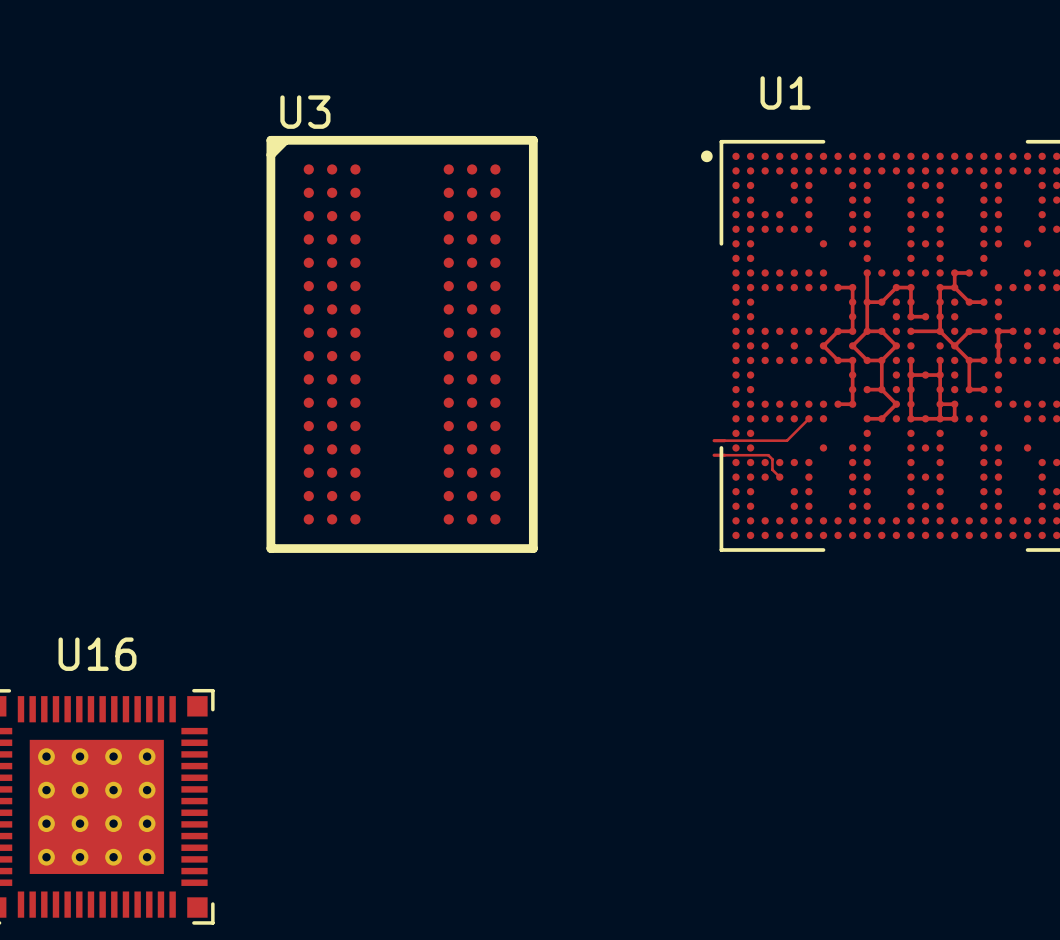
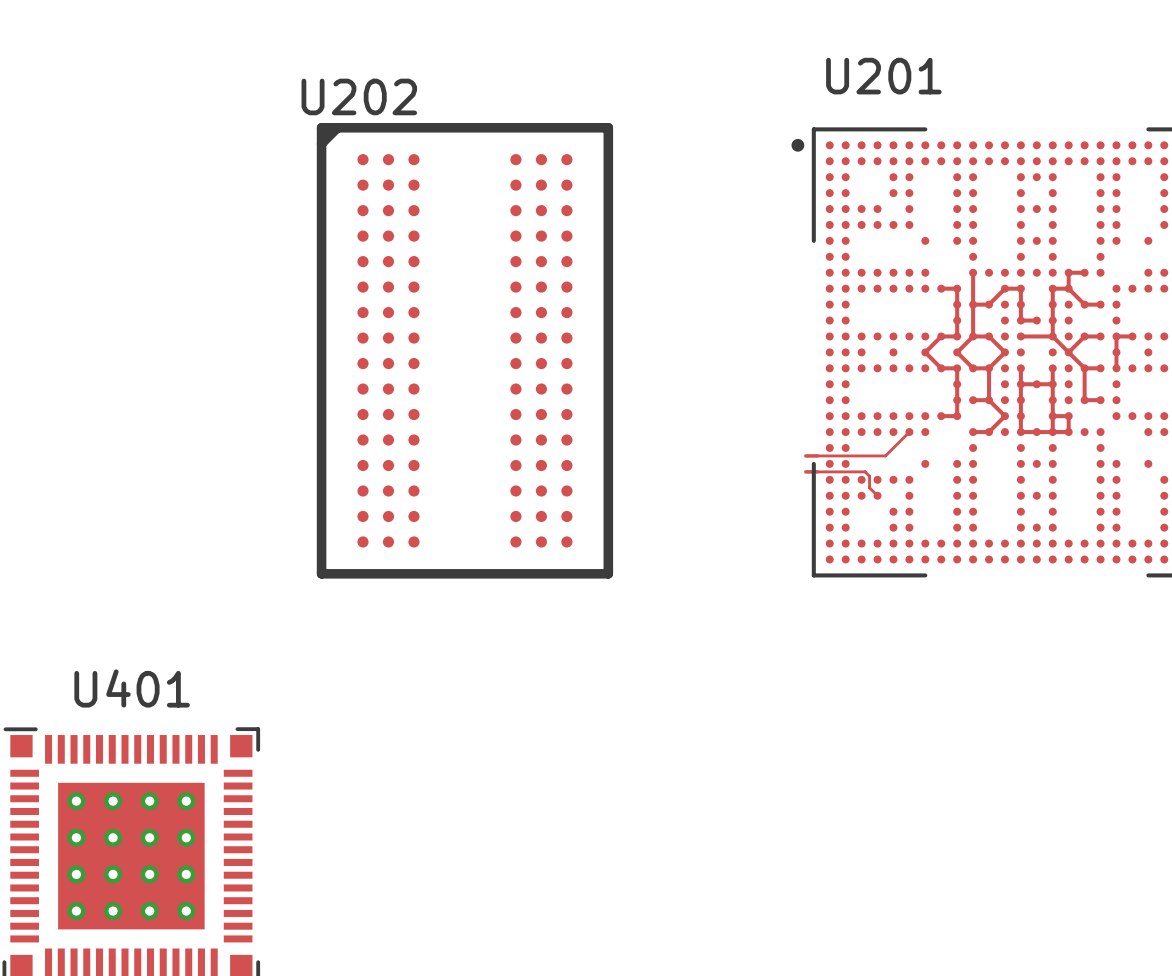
U1 name: U1 (785, 92) -> U201 (883, 76)
U3 name: U3 (305, 112) -> U202 (359, 96)
U16 name: U16 (97, 654) -> U401 (132, 688)

